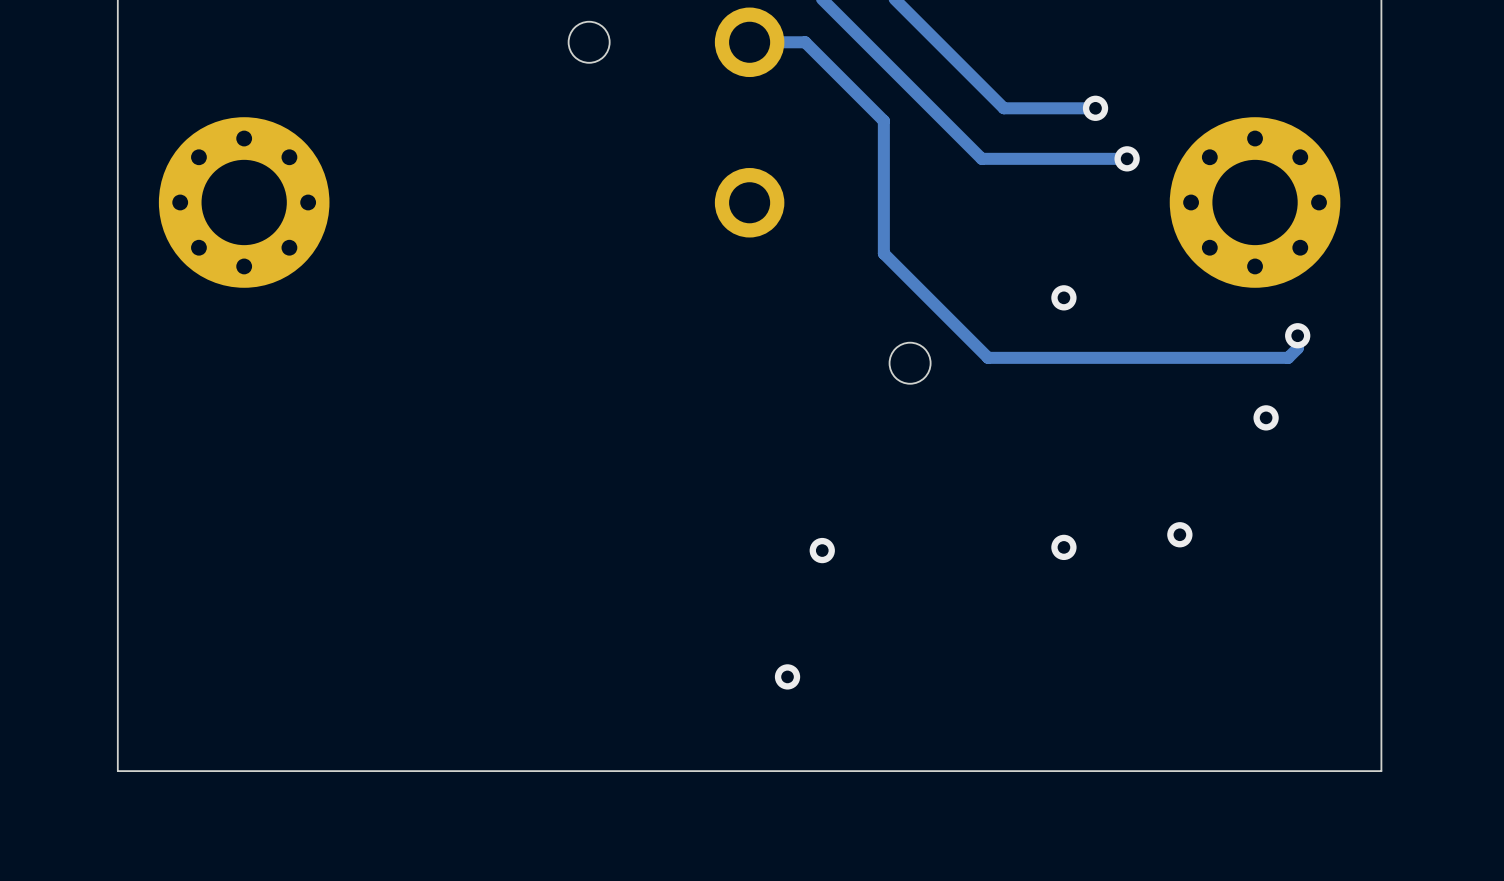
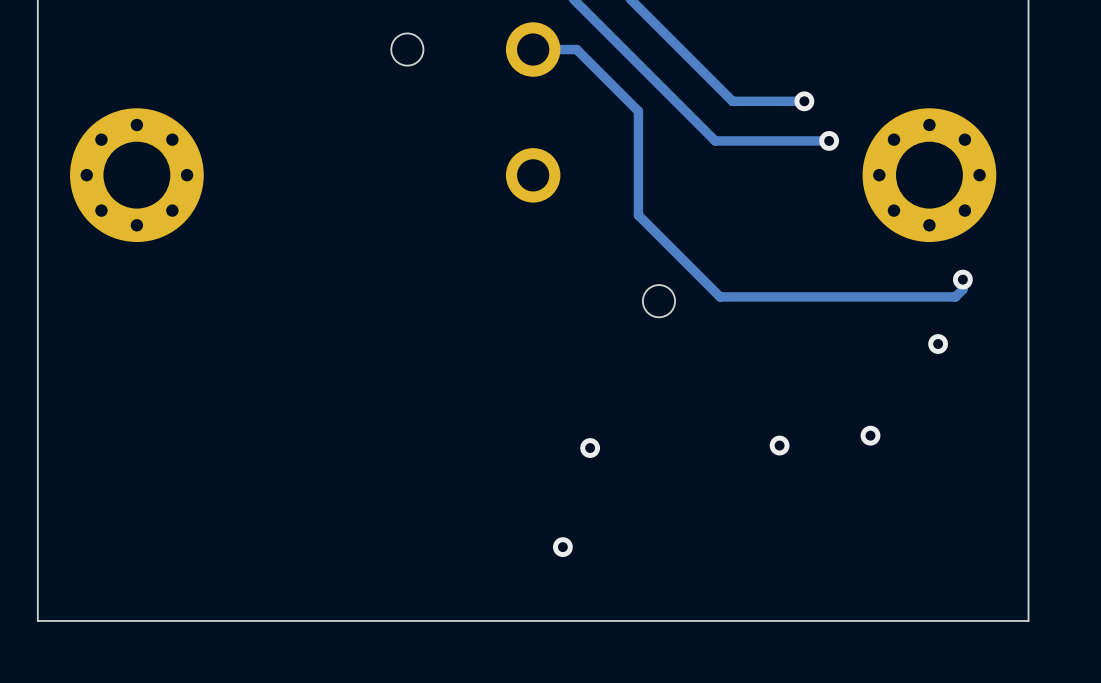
via: (1063, 297) -> none

